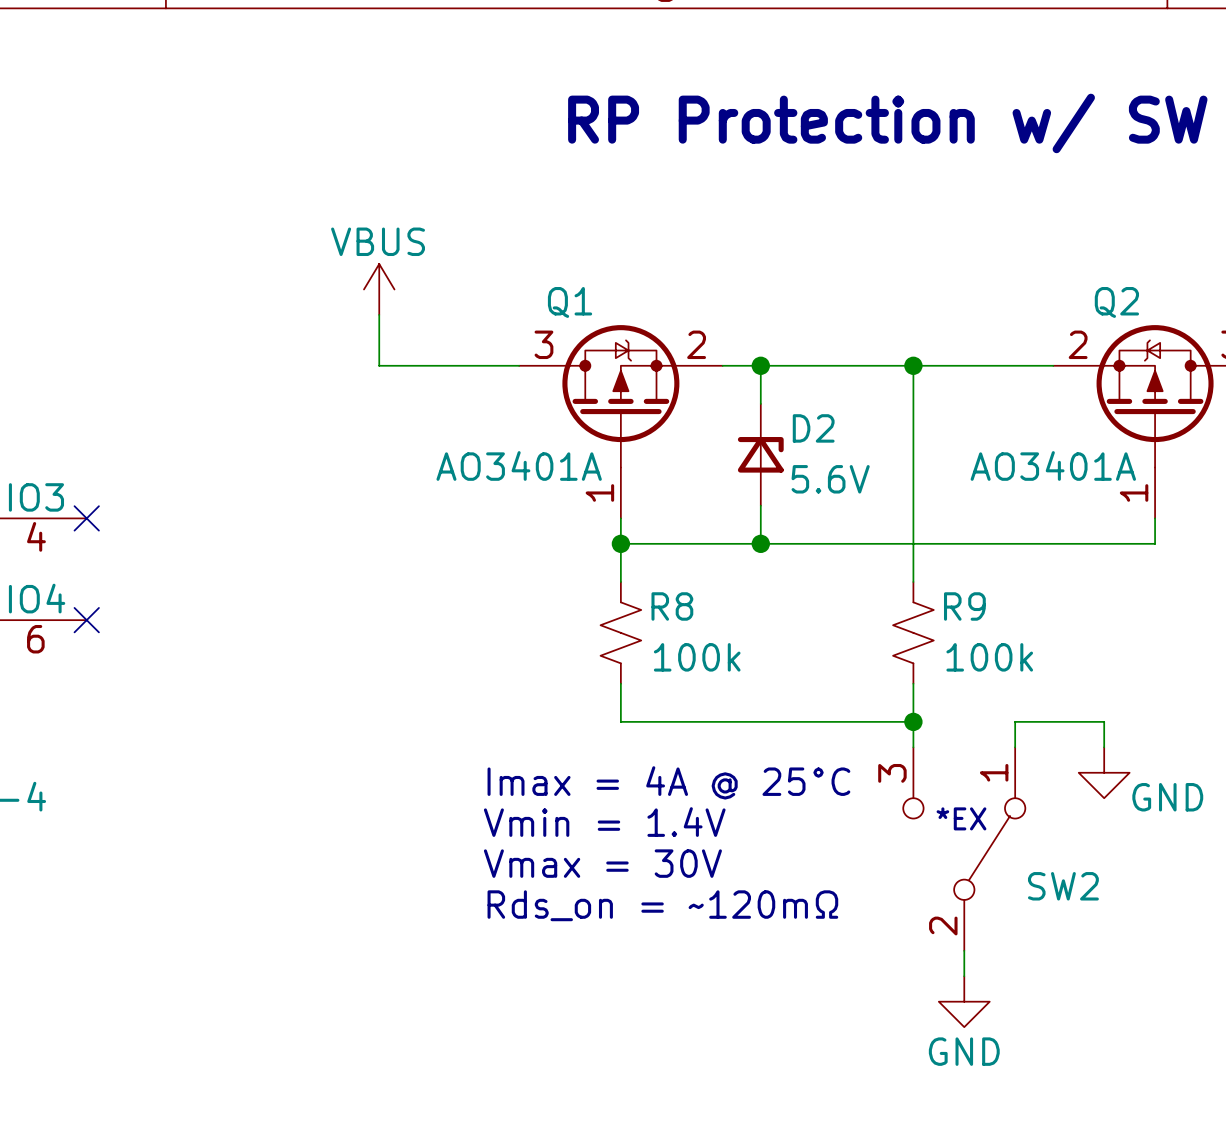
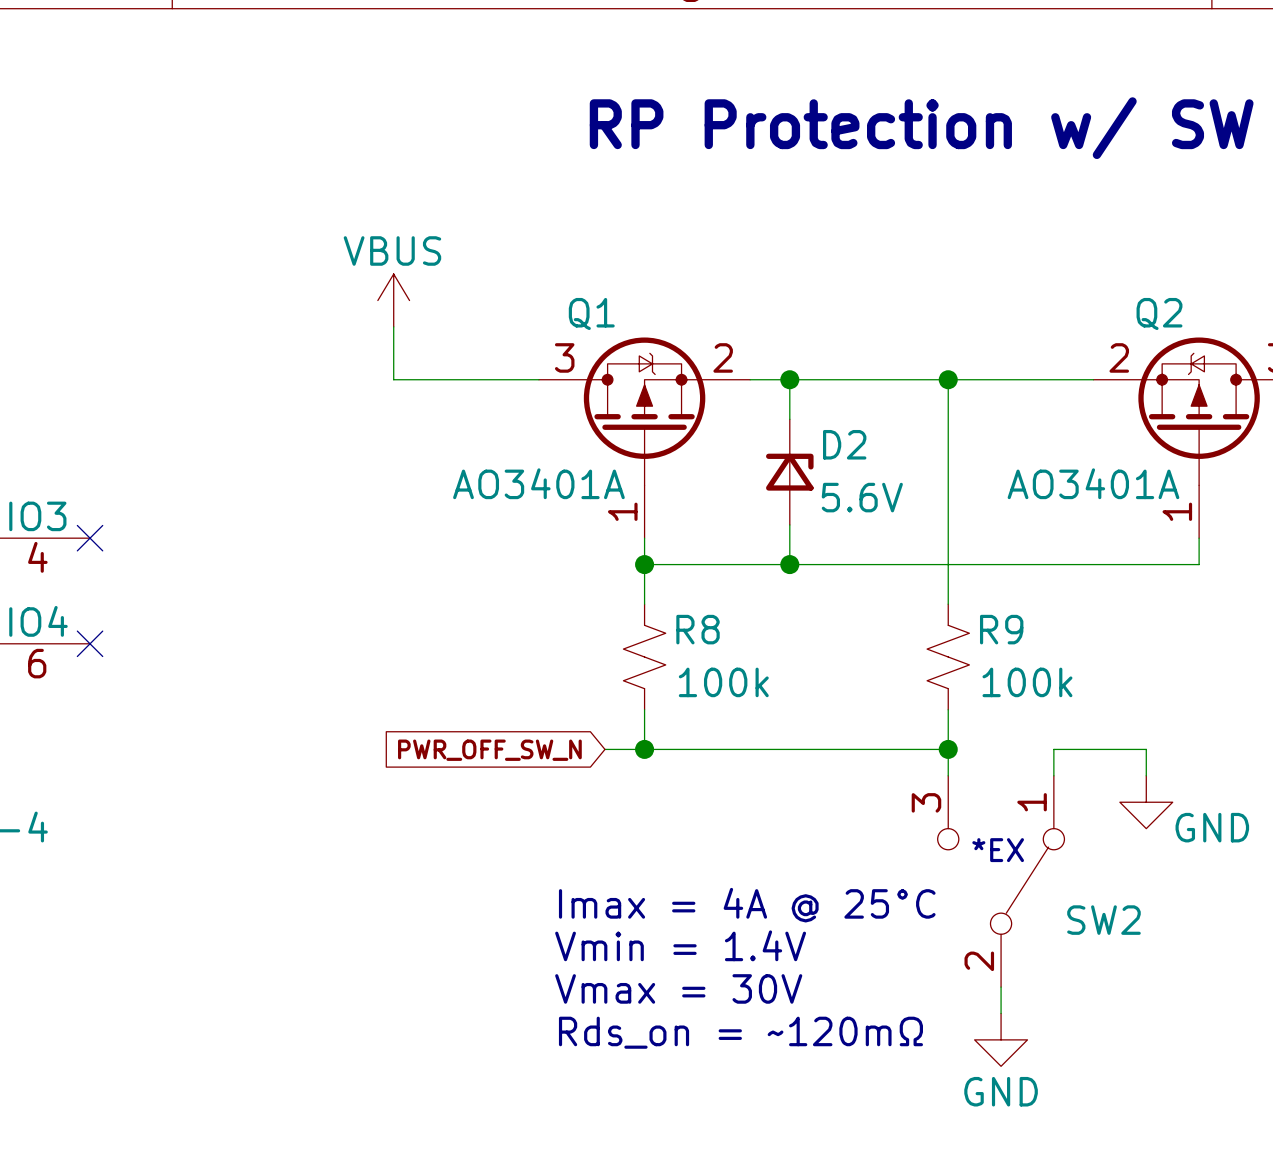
wire: none -> (604, 749) (644, 749)
junction: none -> (644, 749)
global label: none -> PWR_OFF_SW_N (489, 750)
text position: Imax = 4A @ 25°C (668, 782) -> Imax = 4A @ 25°C (747, 905)
text position: Vmin = 1.4V (604, 822) -> Vmin = 1.4V (680, 945)
text position: Vmax = 30V (602, 863) -> Vmax = 30V (678, 988)
text position: Rds_on = ~120mΩ (662, 905) -> Rds_on = ~120mΩ (740, 1032)

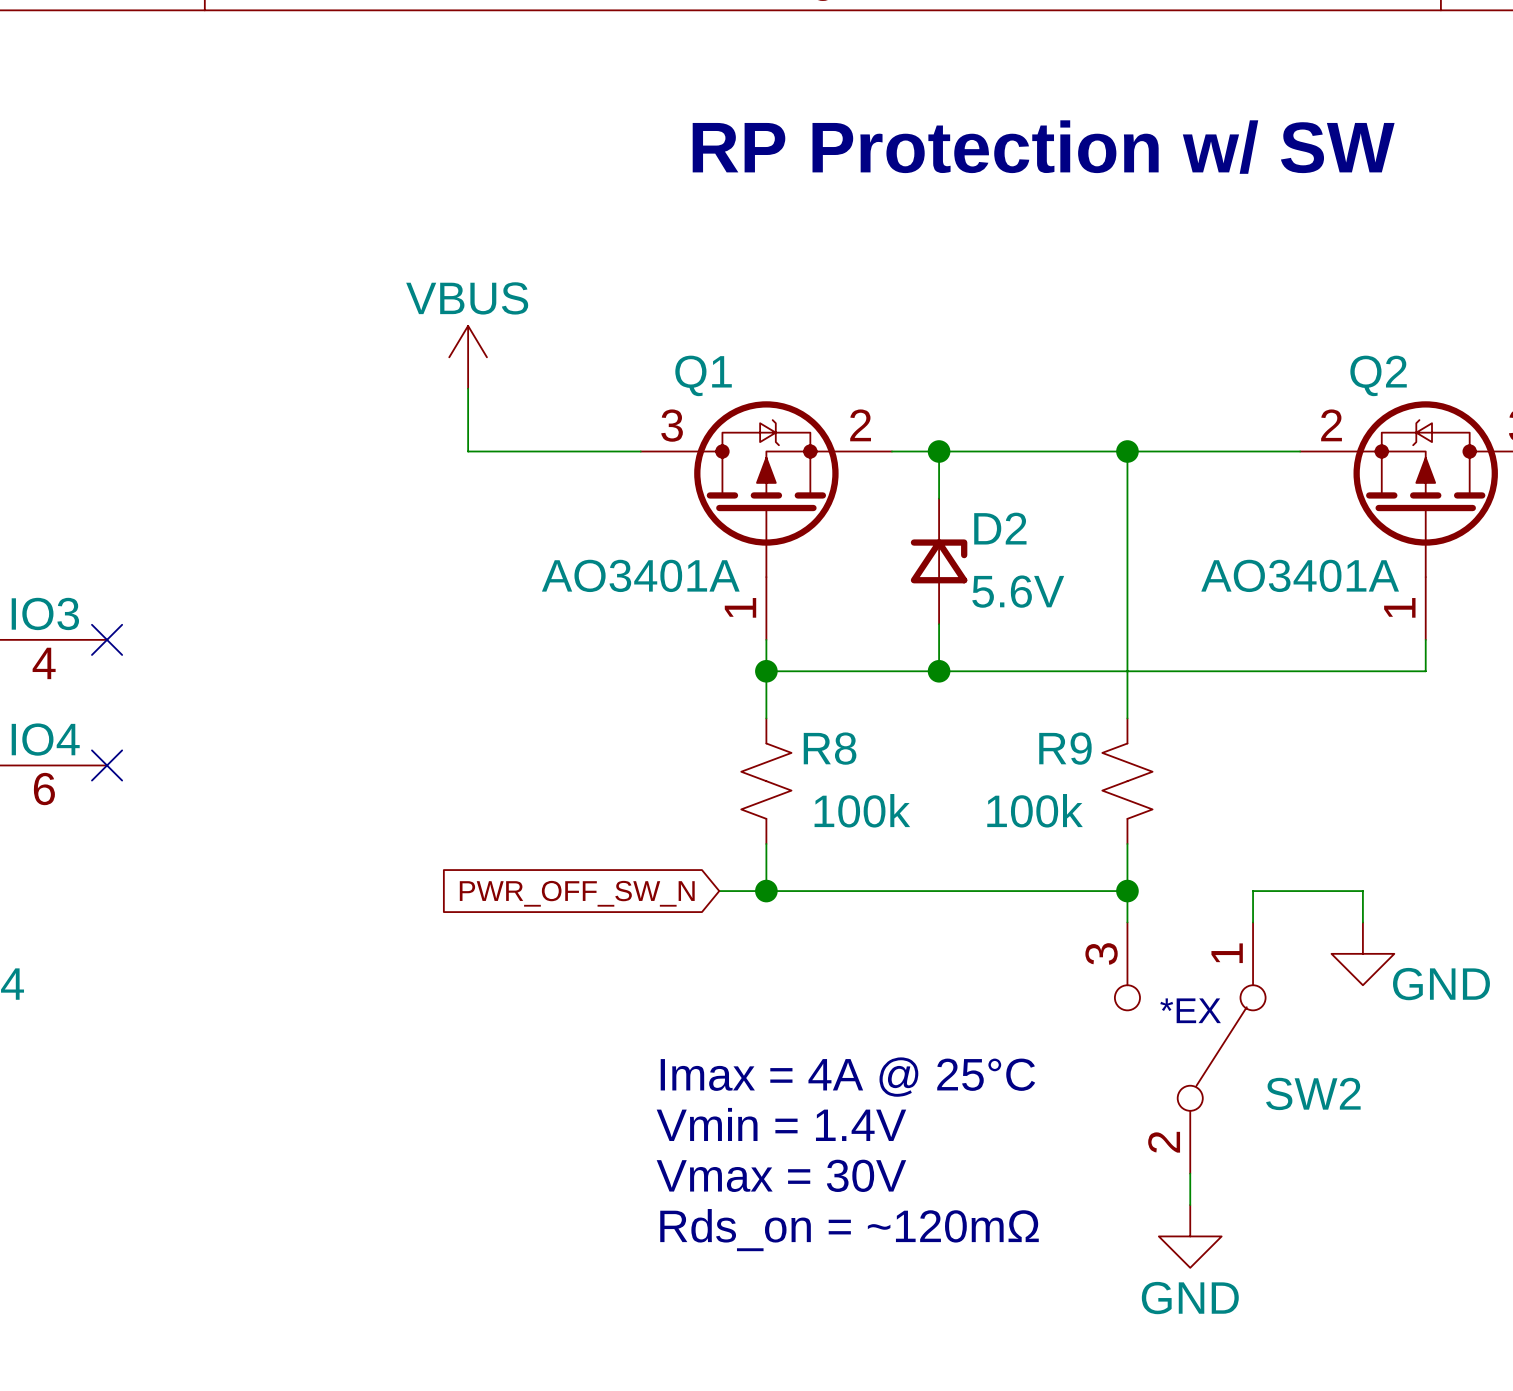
R9 flip: as is (948, 657) -> left-right (1127, 781)

